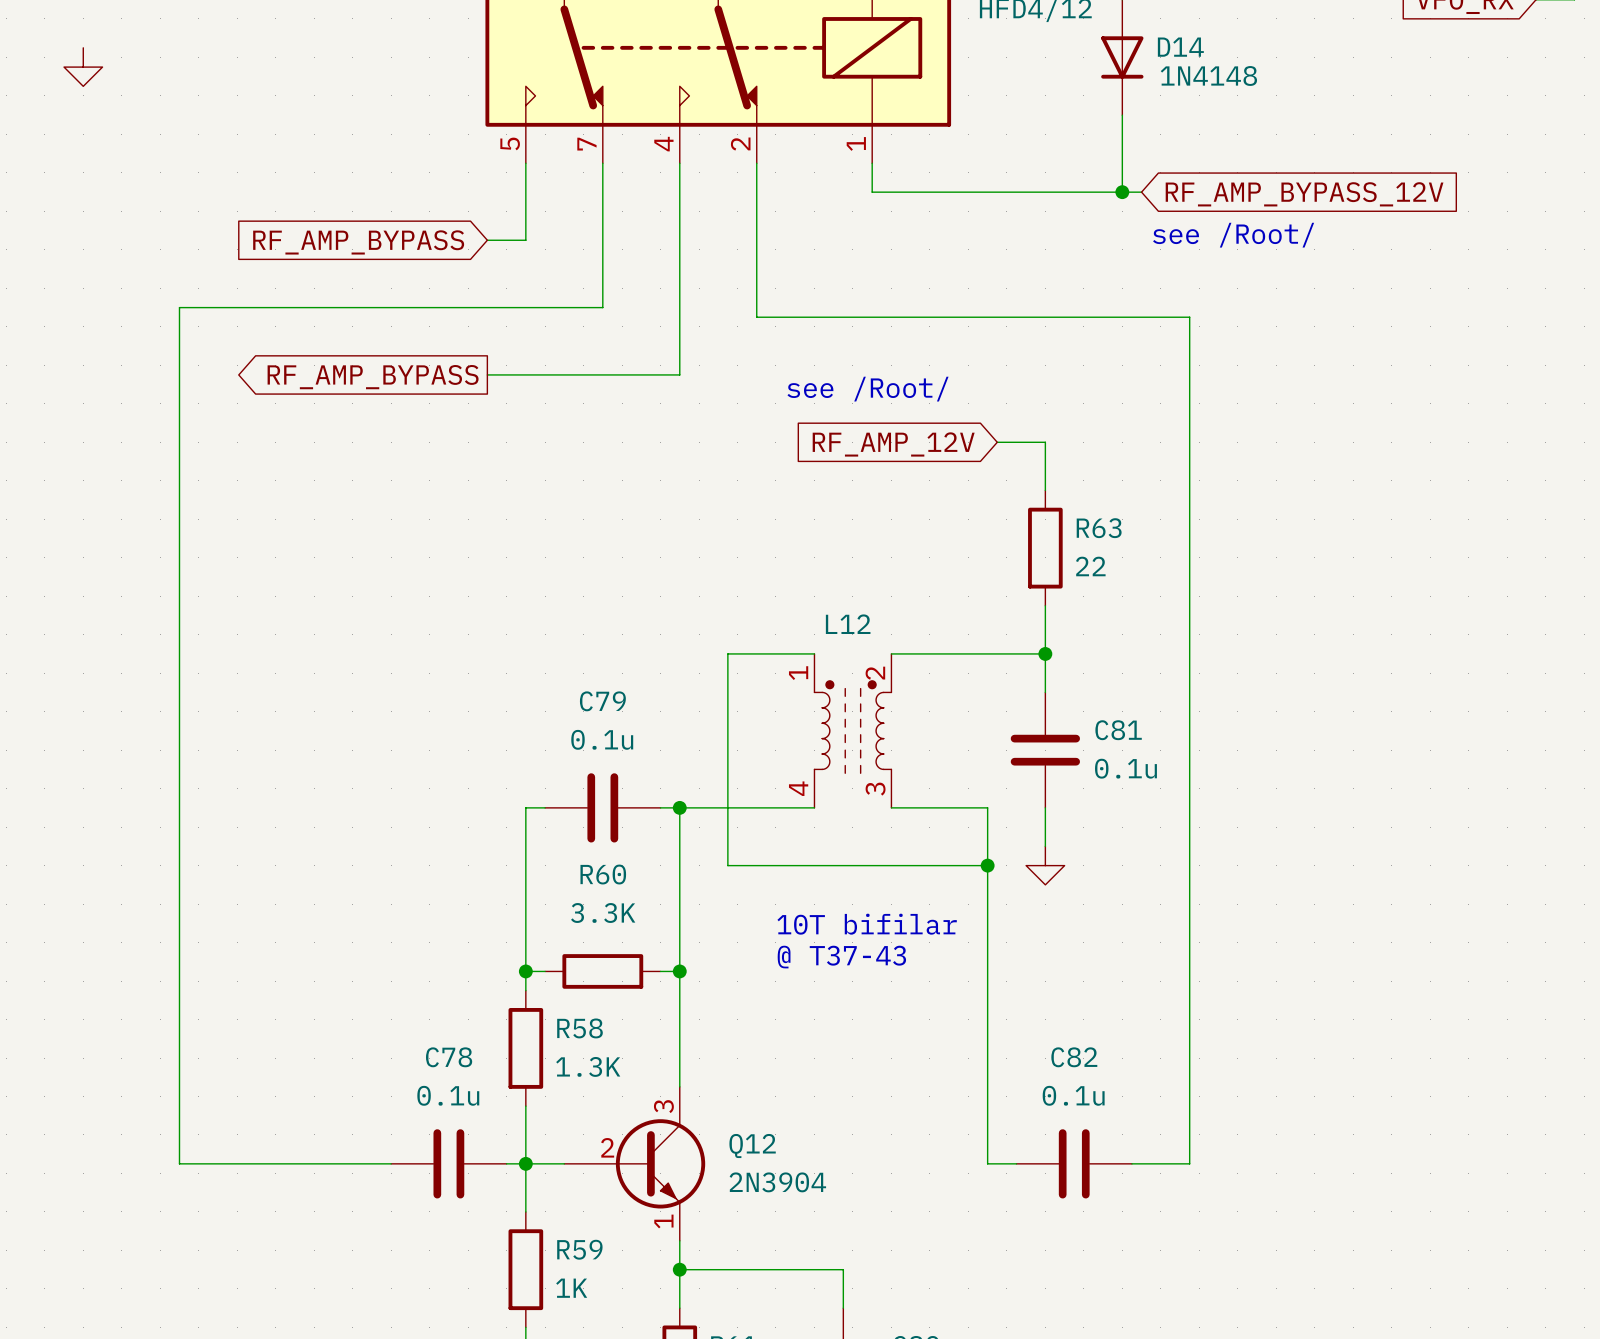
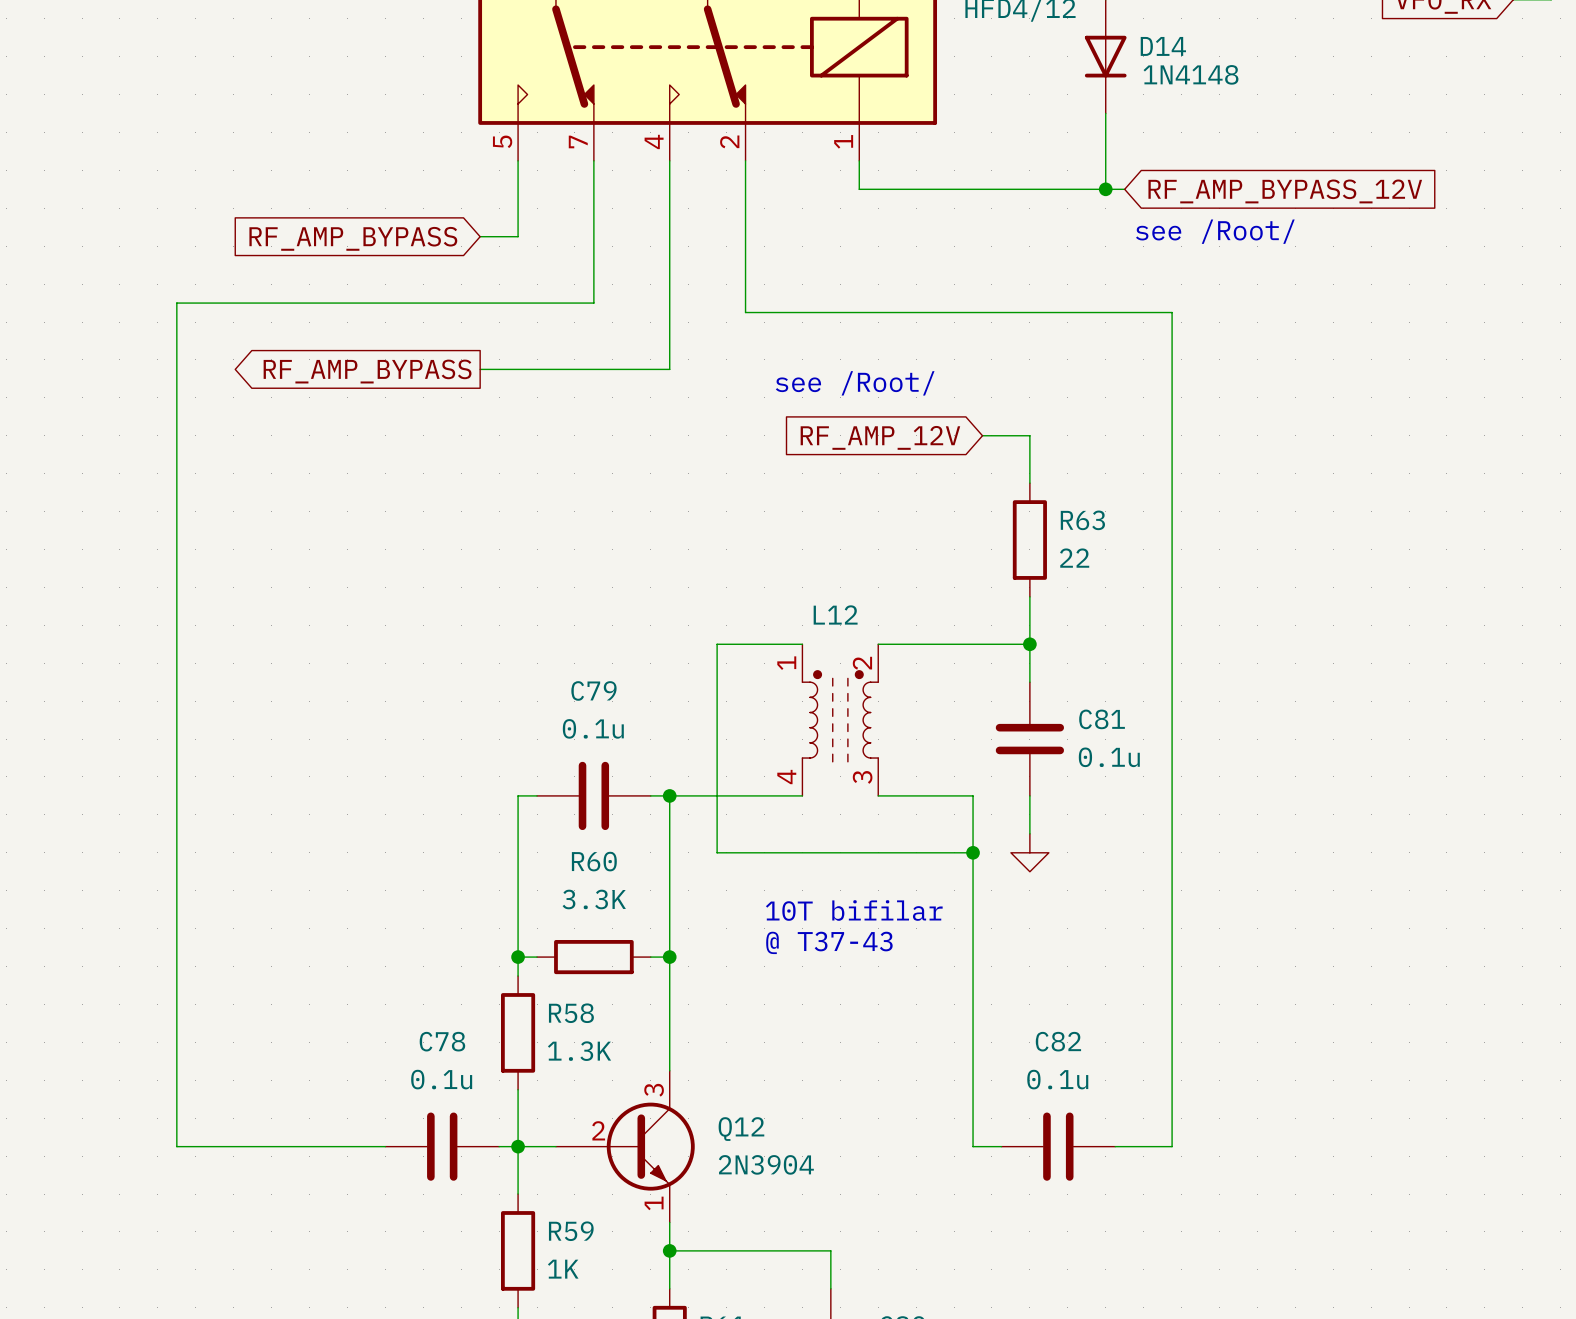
power symbol: (83, 67) -> none

